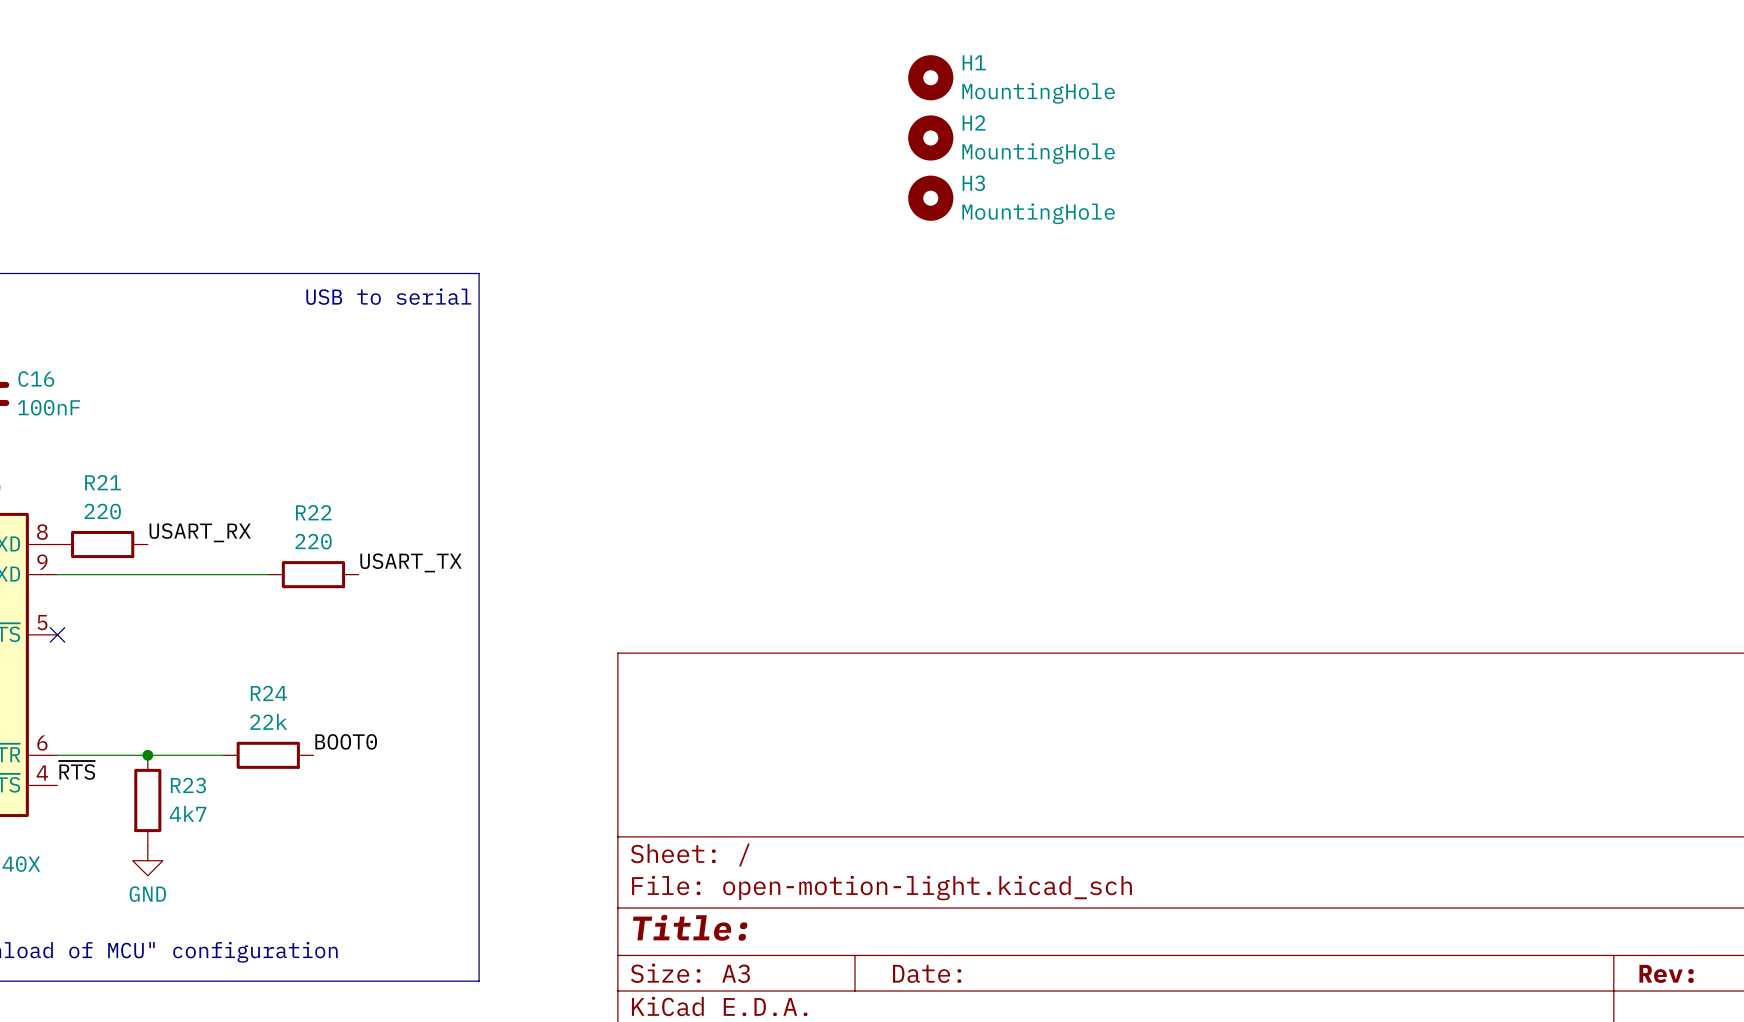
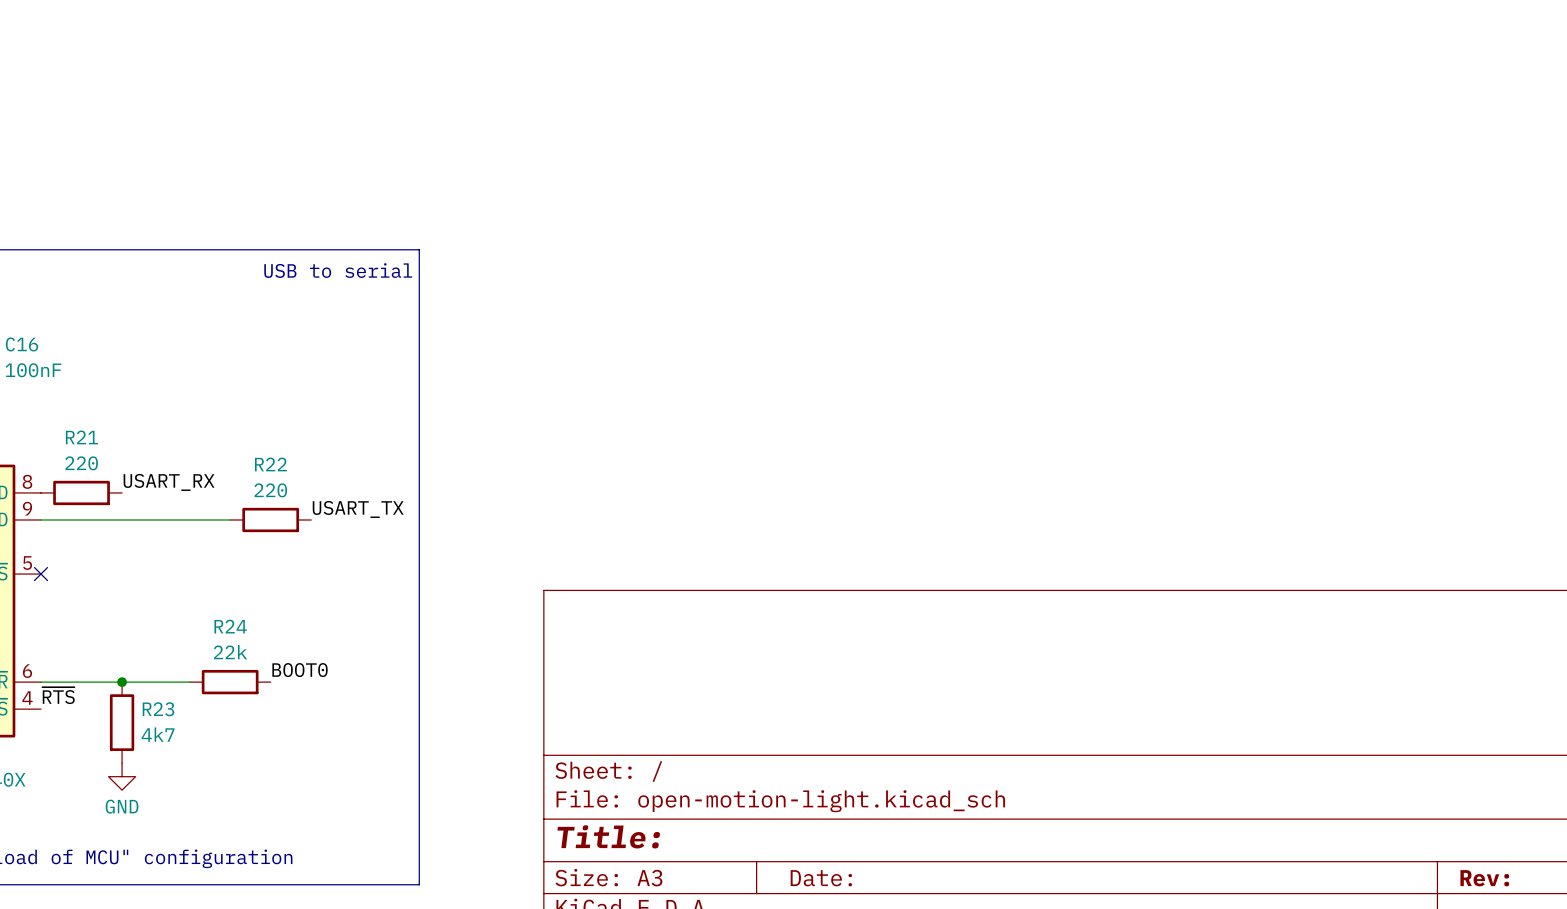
H1: MountingHole (930, 77) -> none
H2: MountingHole (930, 137) -> none
H3: MountingHole (930, 198) -> none

